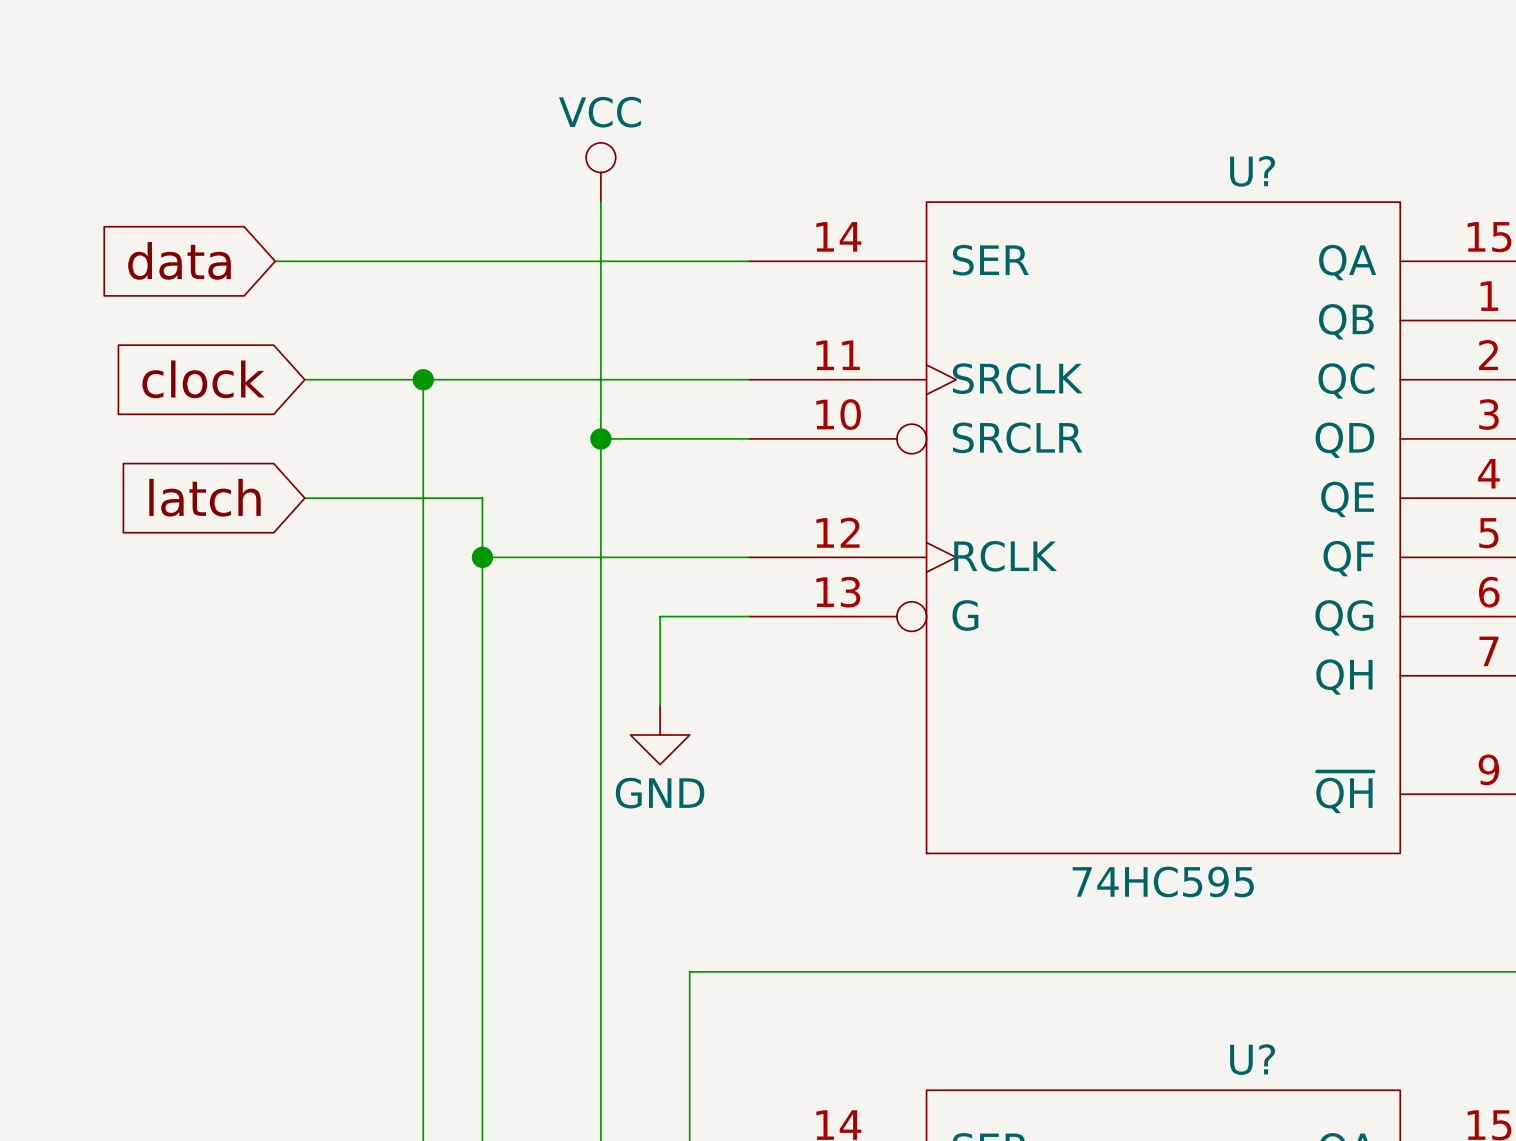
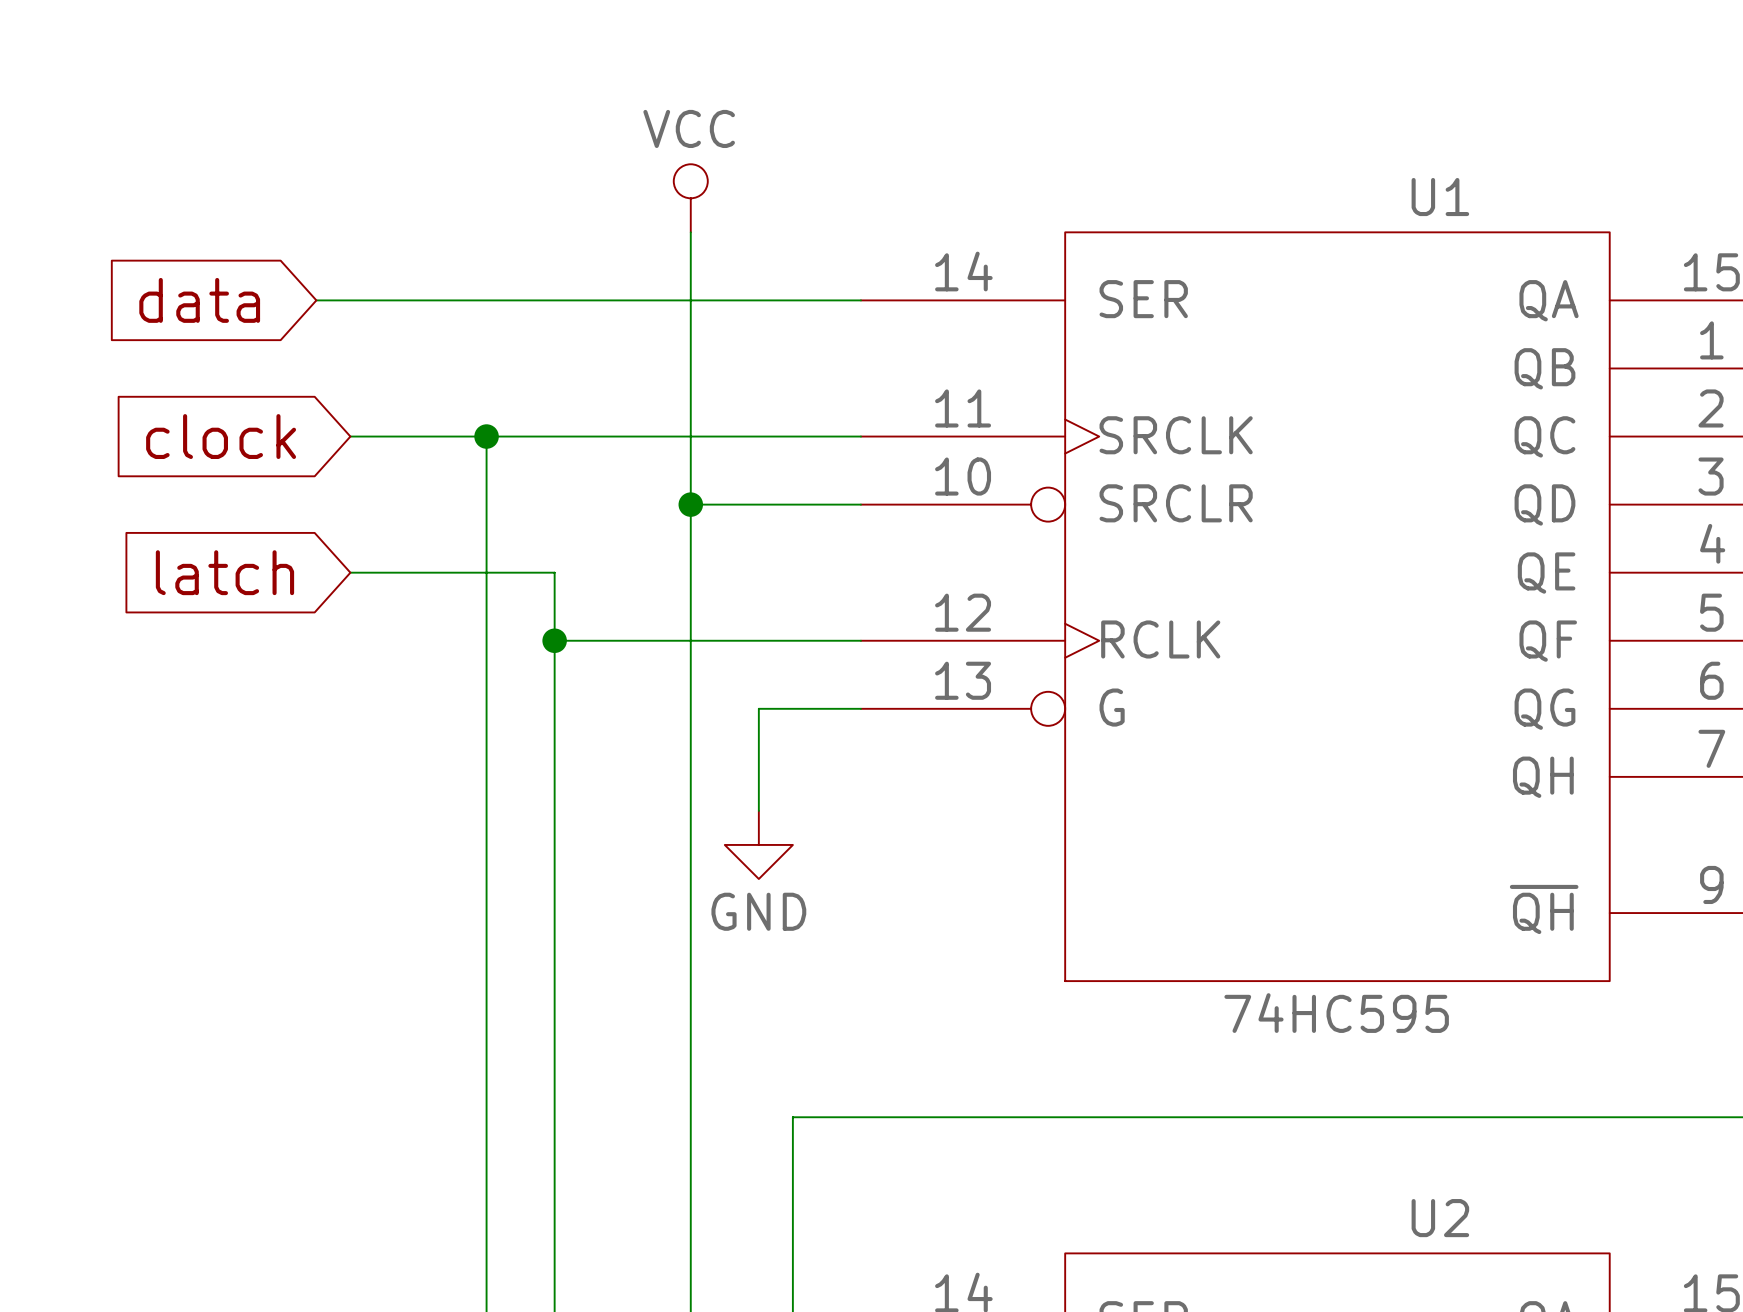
U? name: U? (1252, 171) -> U1 (1440, 197)
U? name: U? (1252, 1059) -> U2 (1440, 1218)

